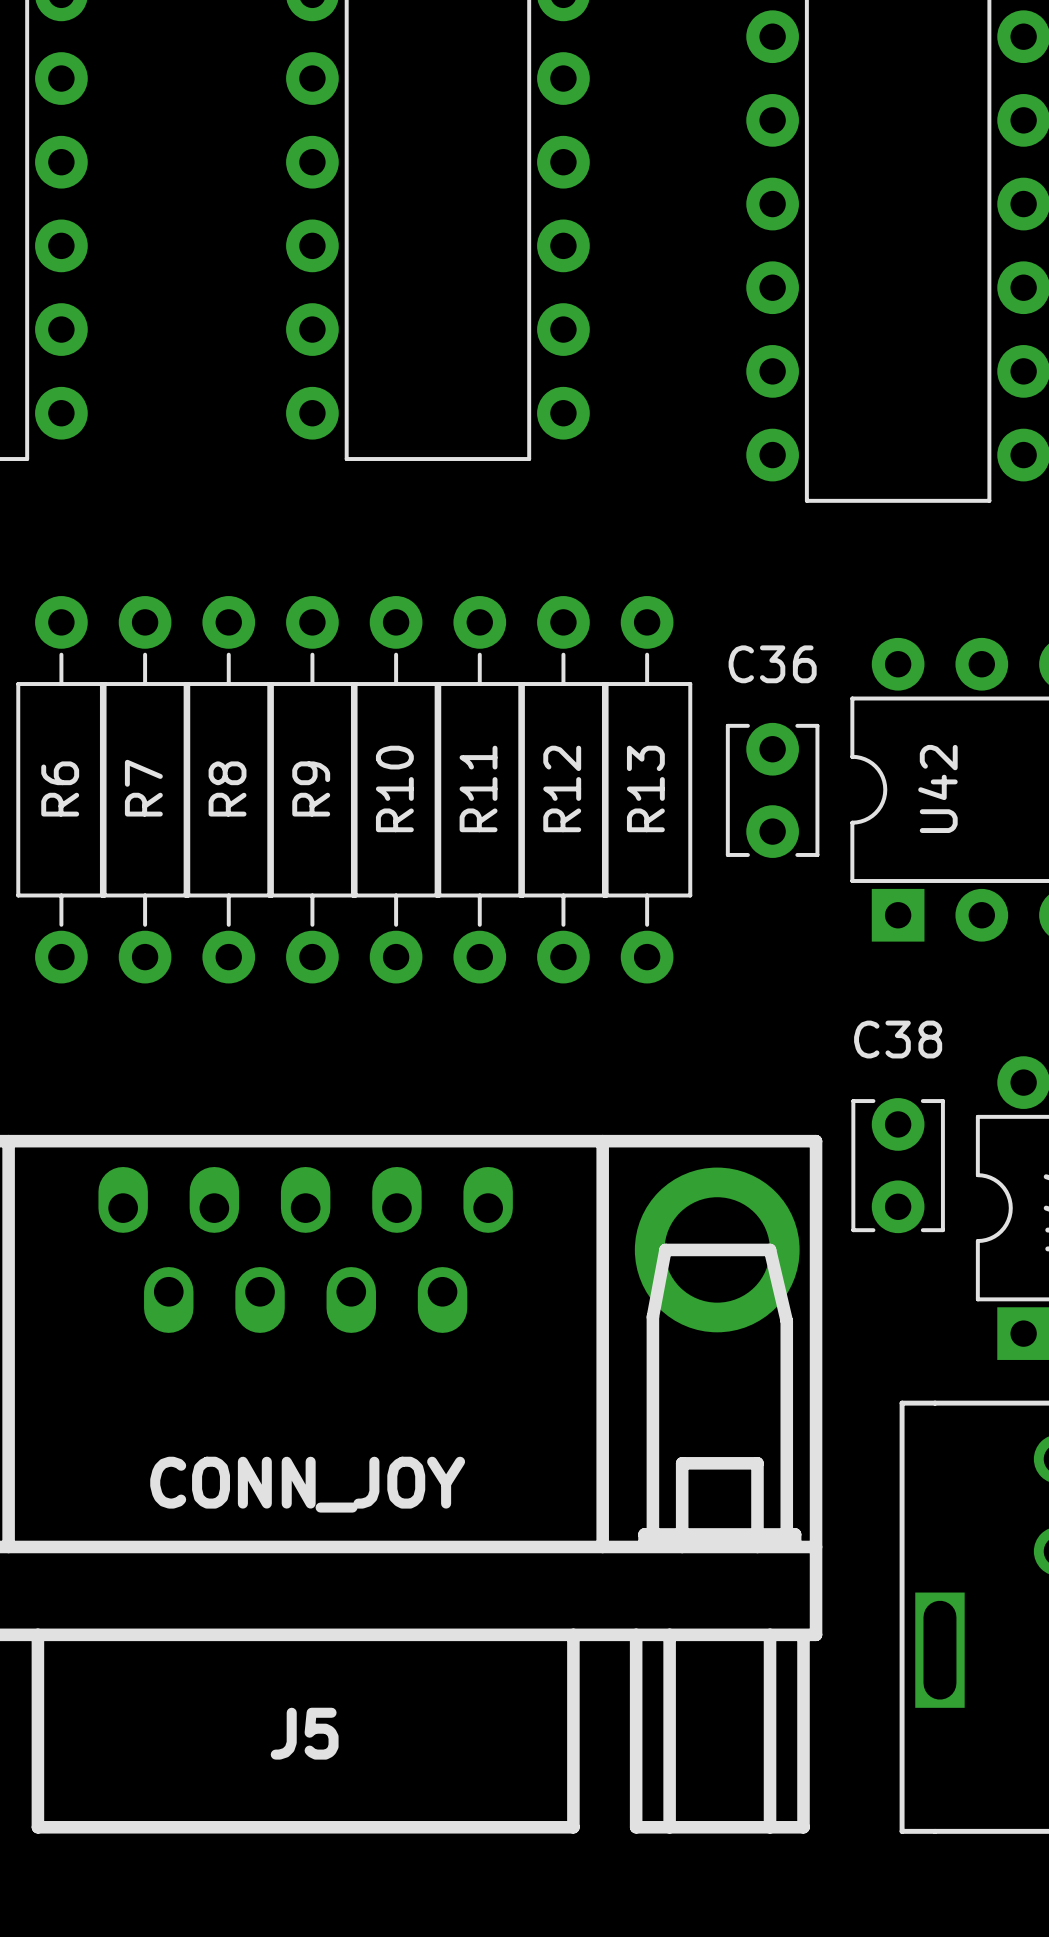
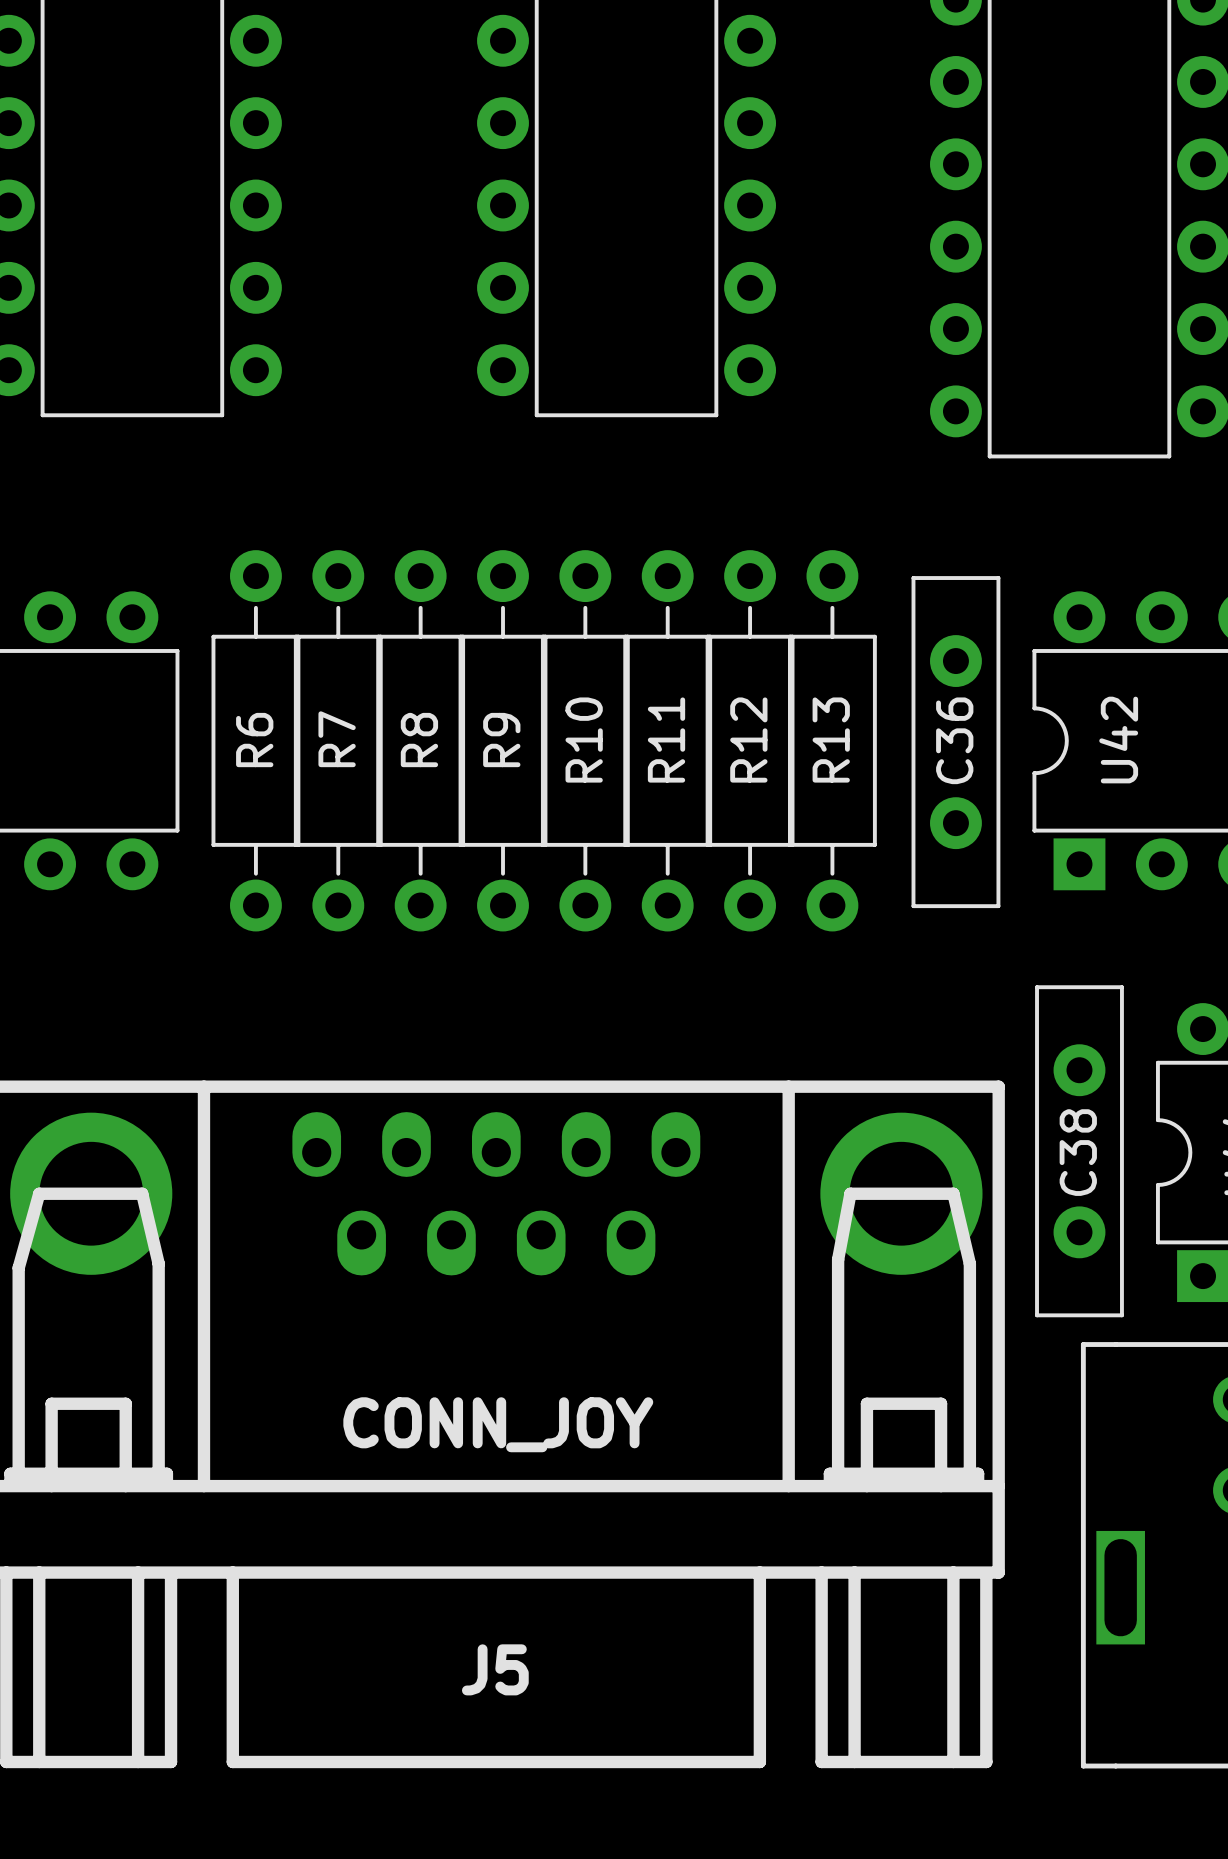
C36 name position: C36 (772, 664) -> C36 (954, 740)
C36 footprint: [725, 722, 820, 858] -> [911, 576, 1001, 909]
C38 name position: C38 (898, 1039) -> C38 (1078, 1152)
C38 footprint: [851, 1098, 945, 1234] -> [1035, 985, 1124, 1318]

